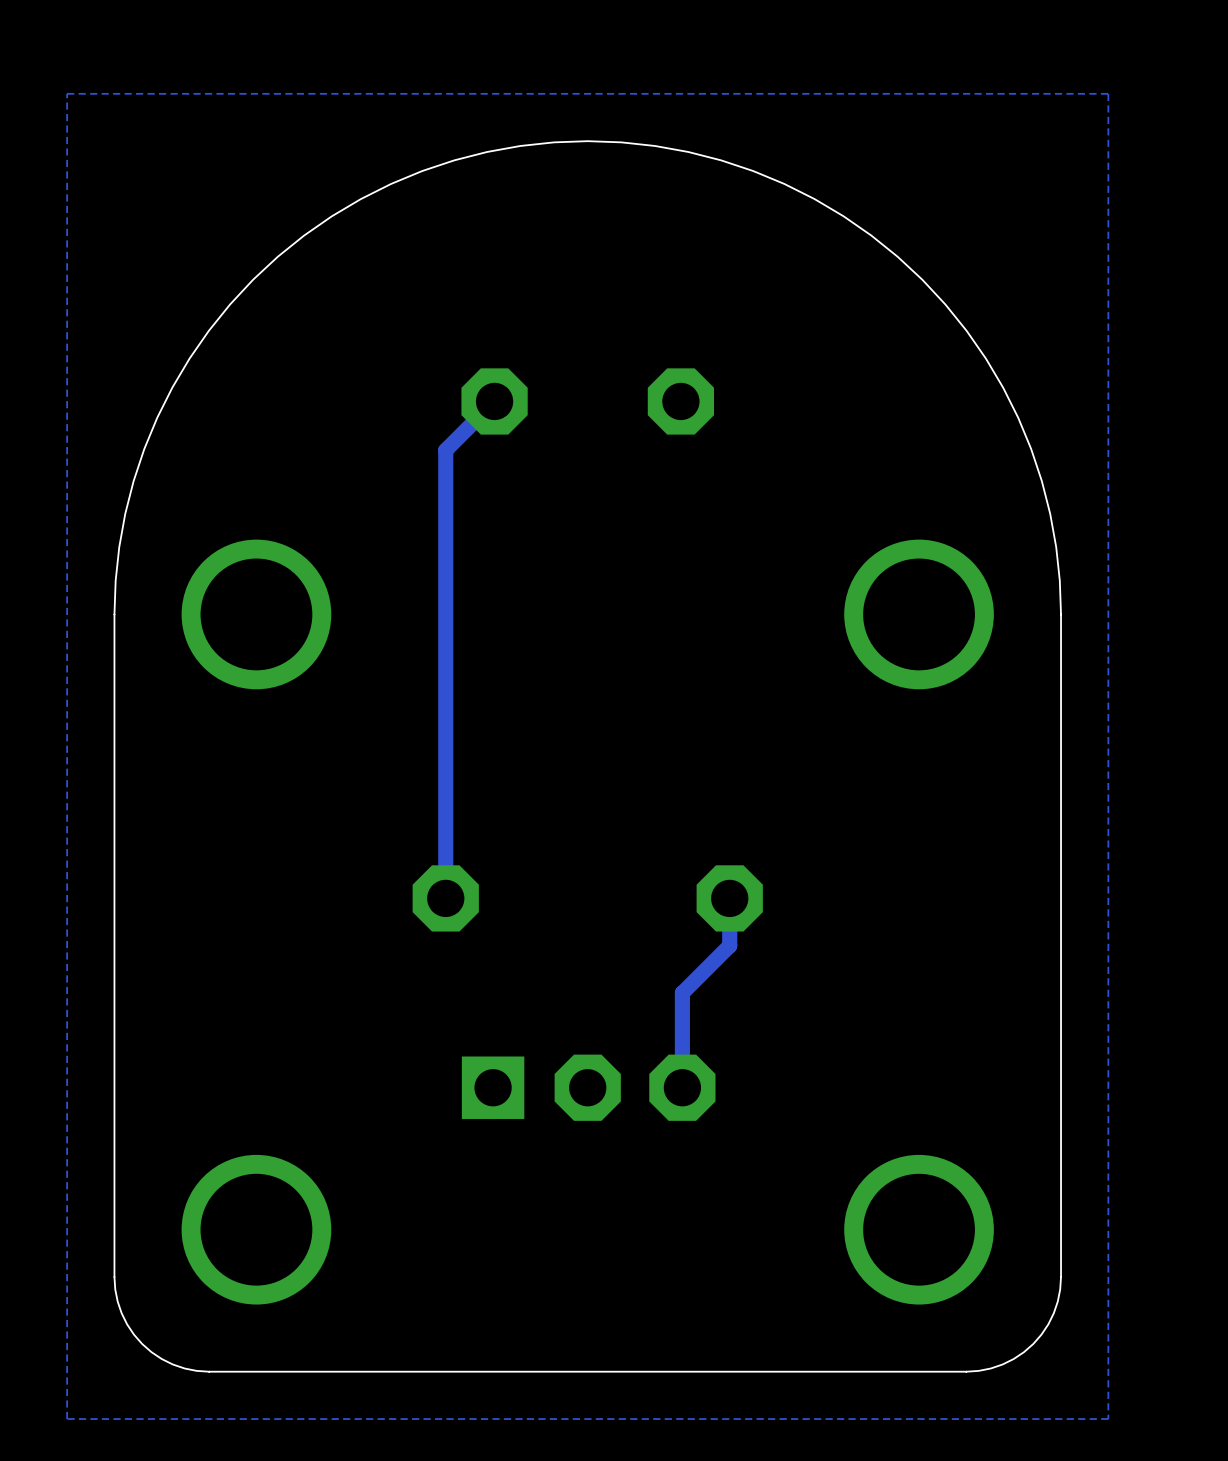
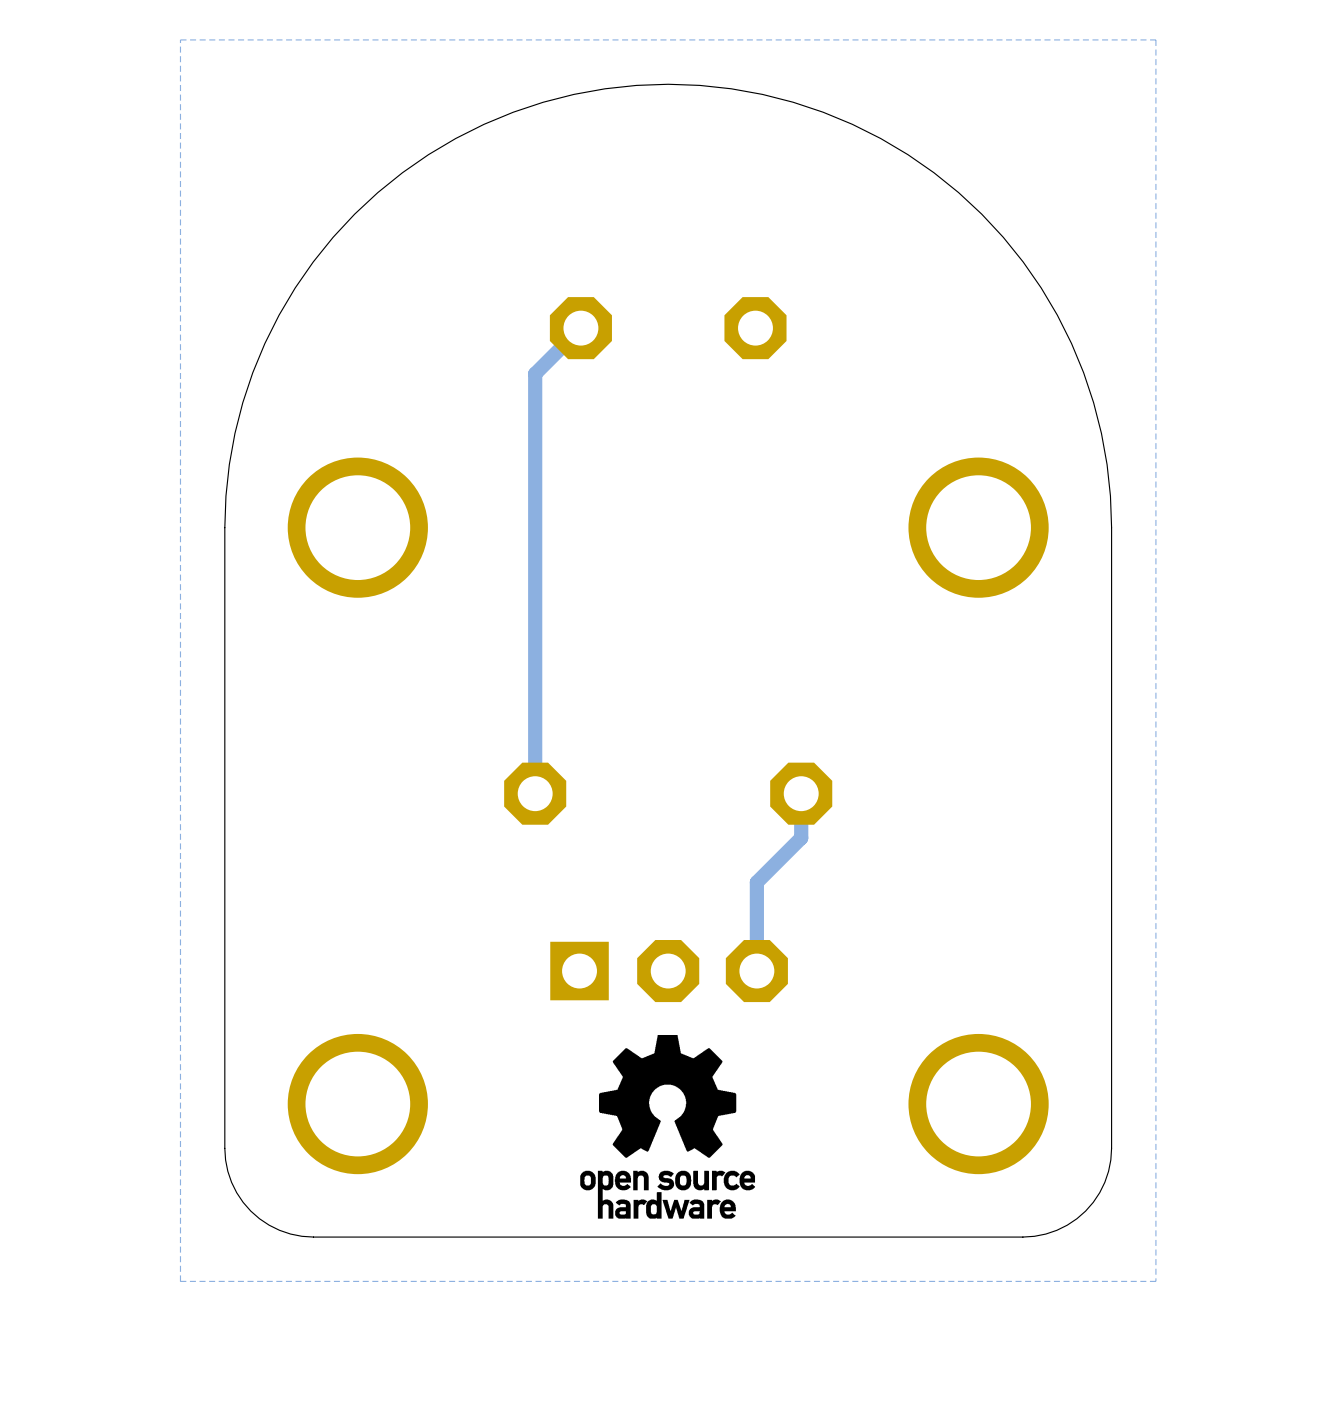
drawing: none -> [580, 1034, 756, 1219]

